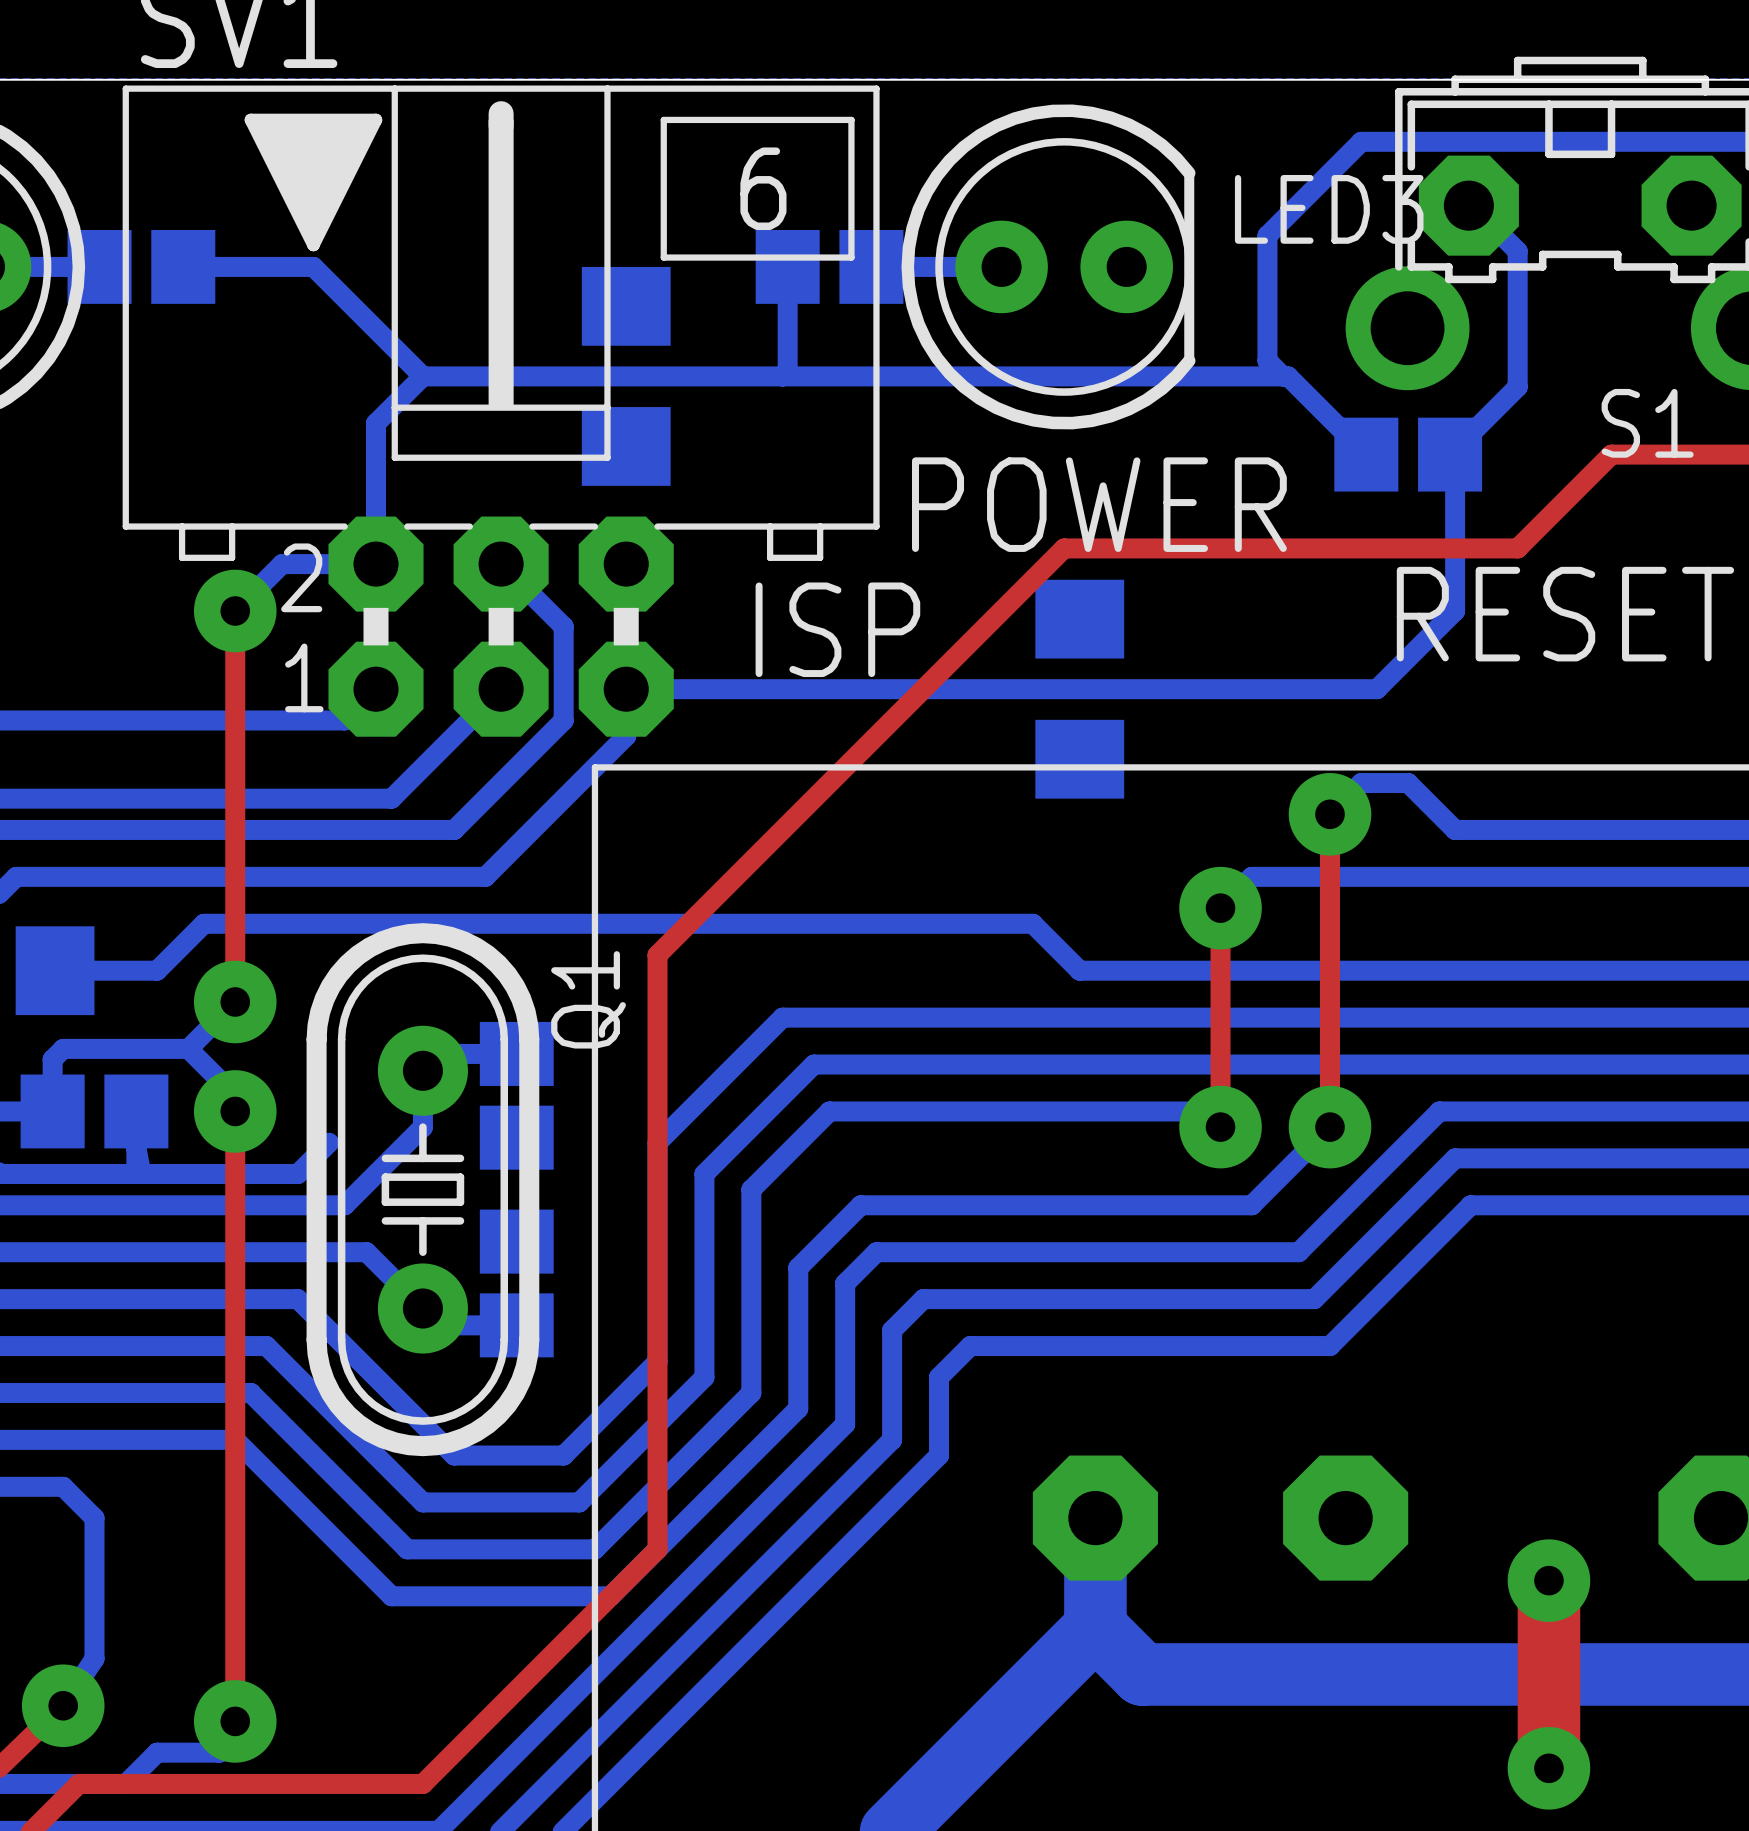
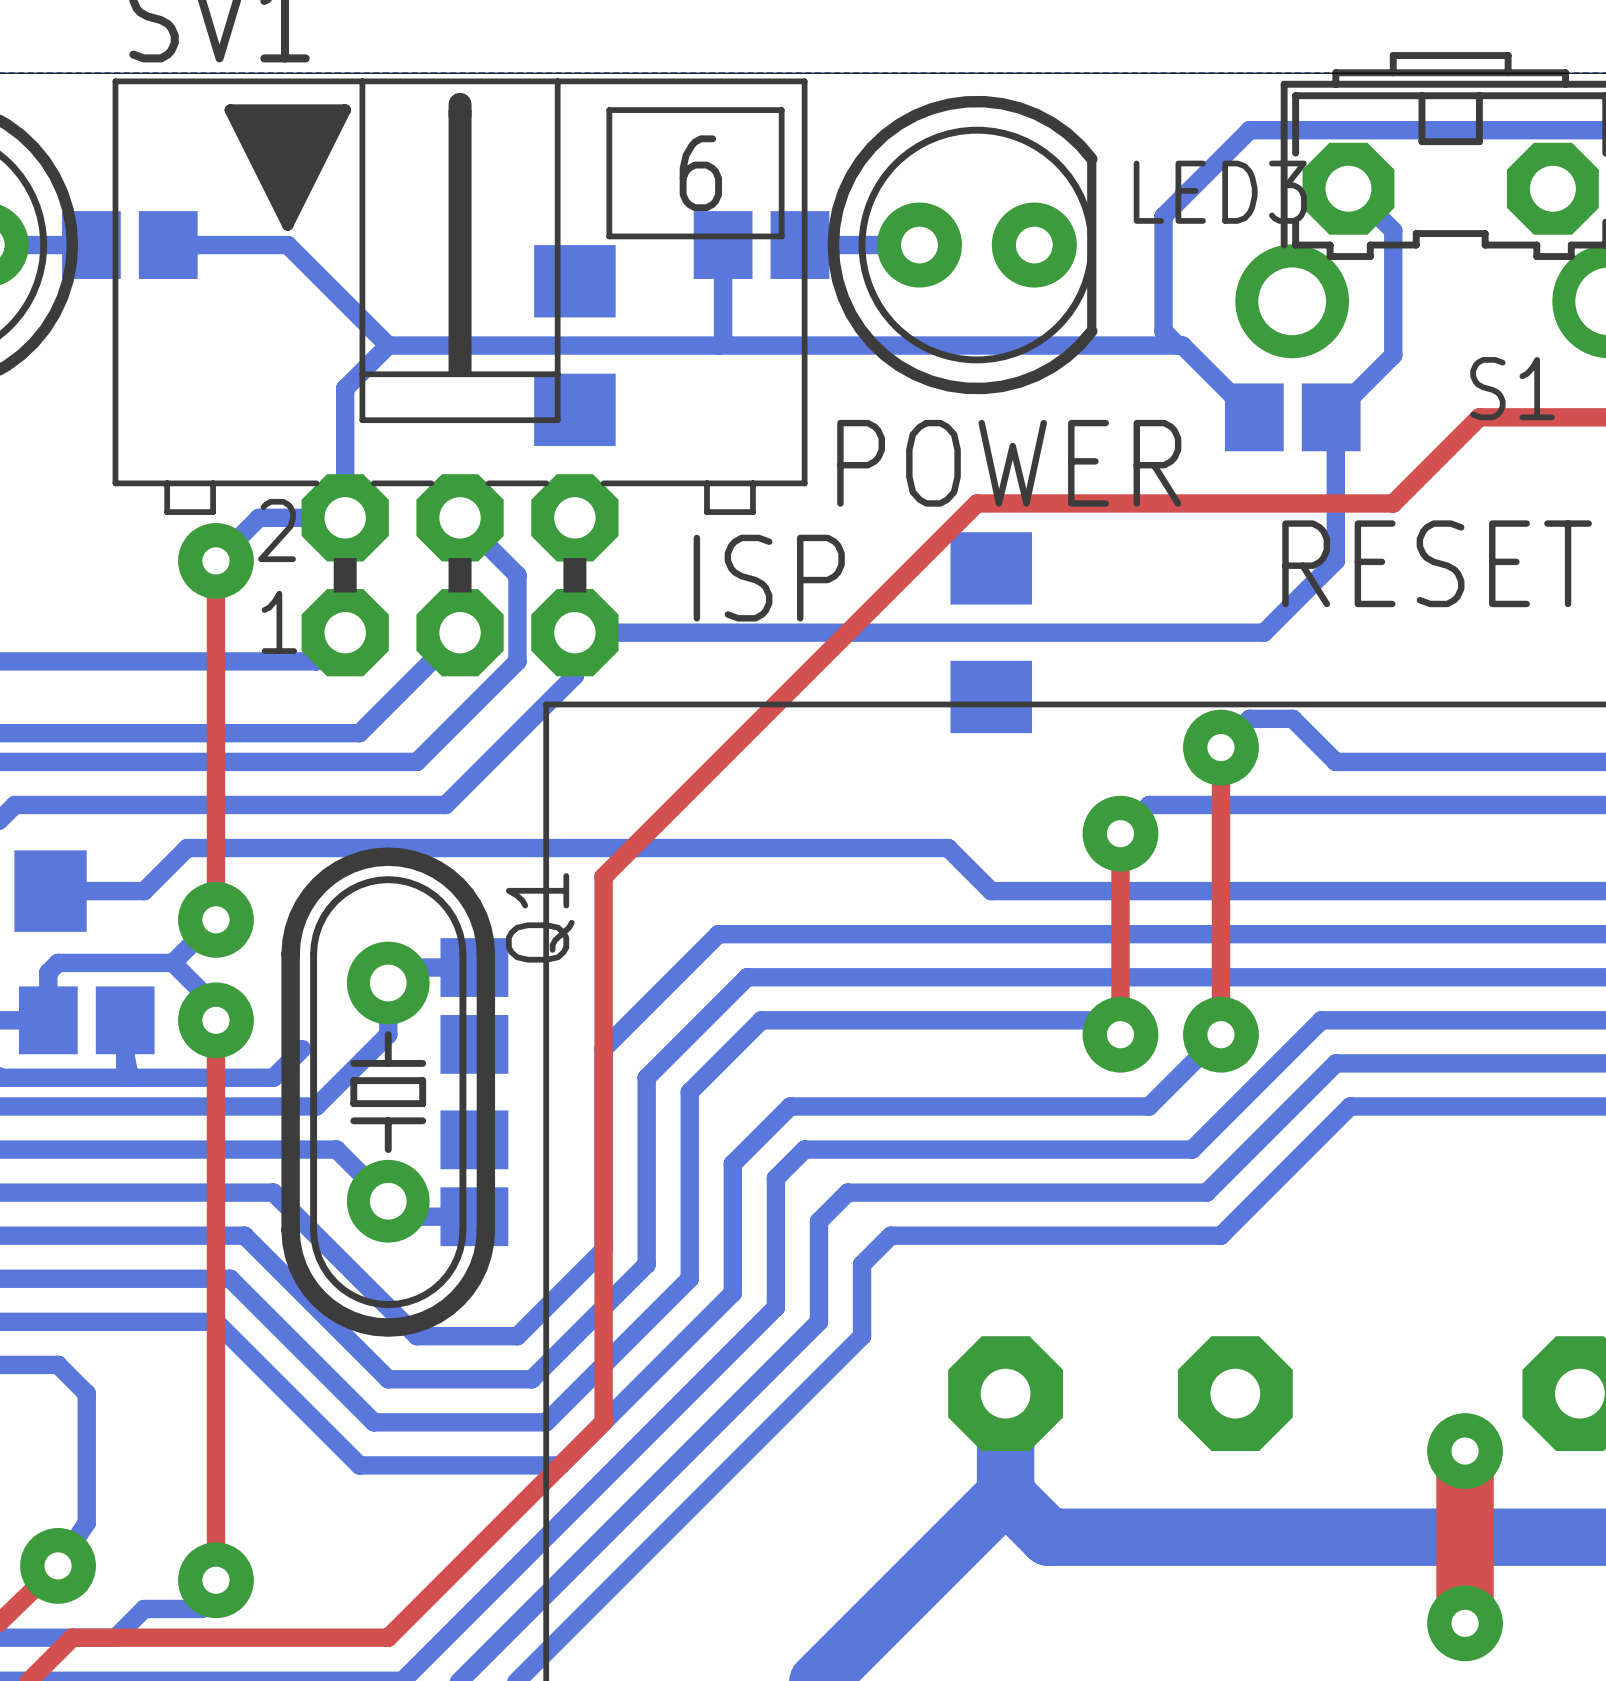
top track: (1548, 1580) (1548, 1768) -> (1465, 1451) (1465, 1623)
via position: (1548, 1580) -> (1465, 1451)
via position: (1548, 1768) -> (1465, 1623)

